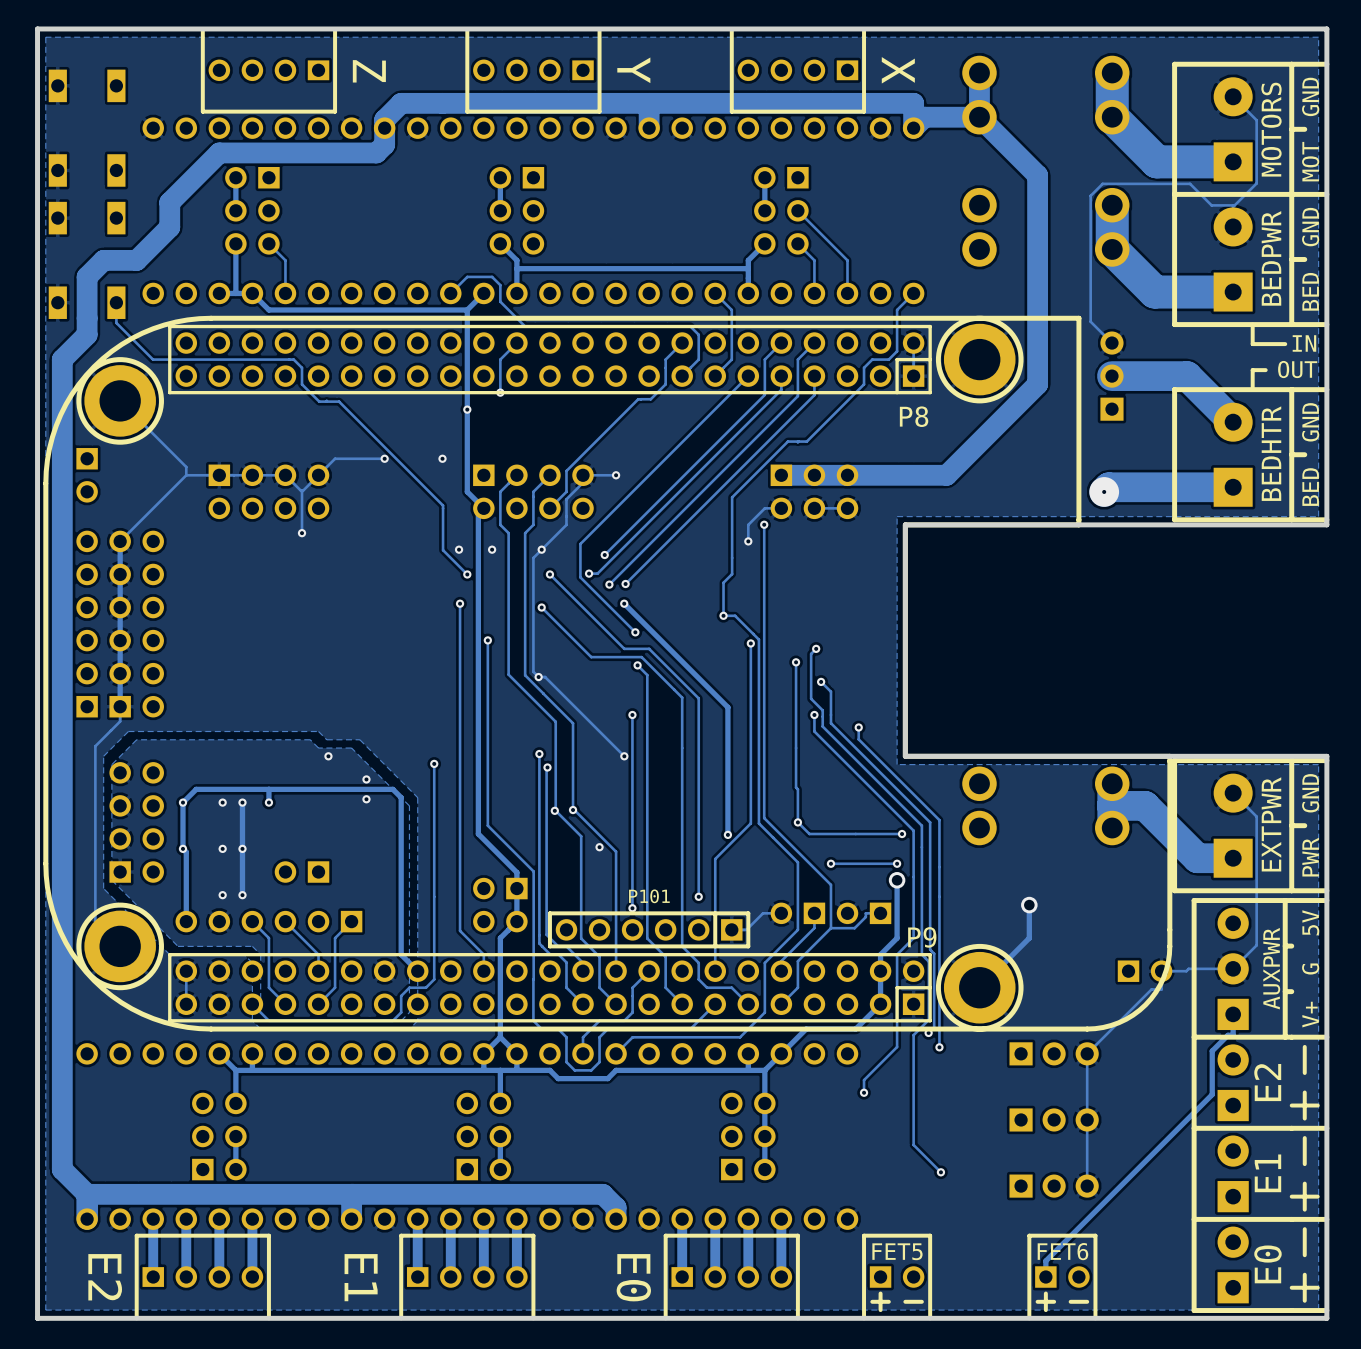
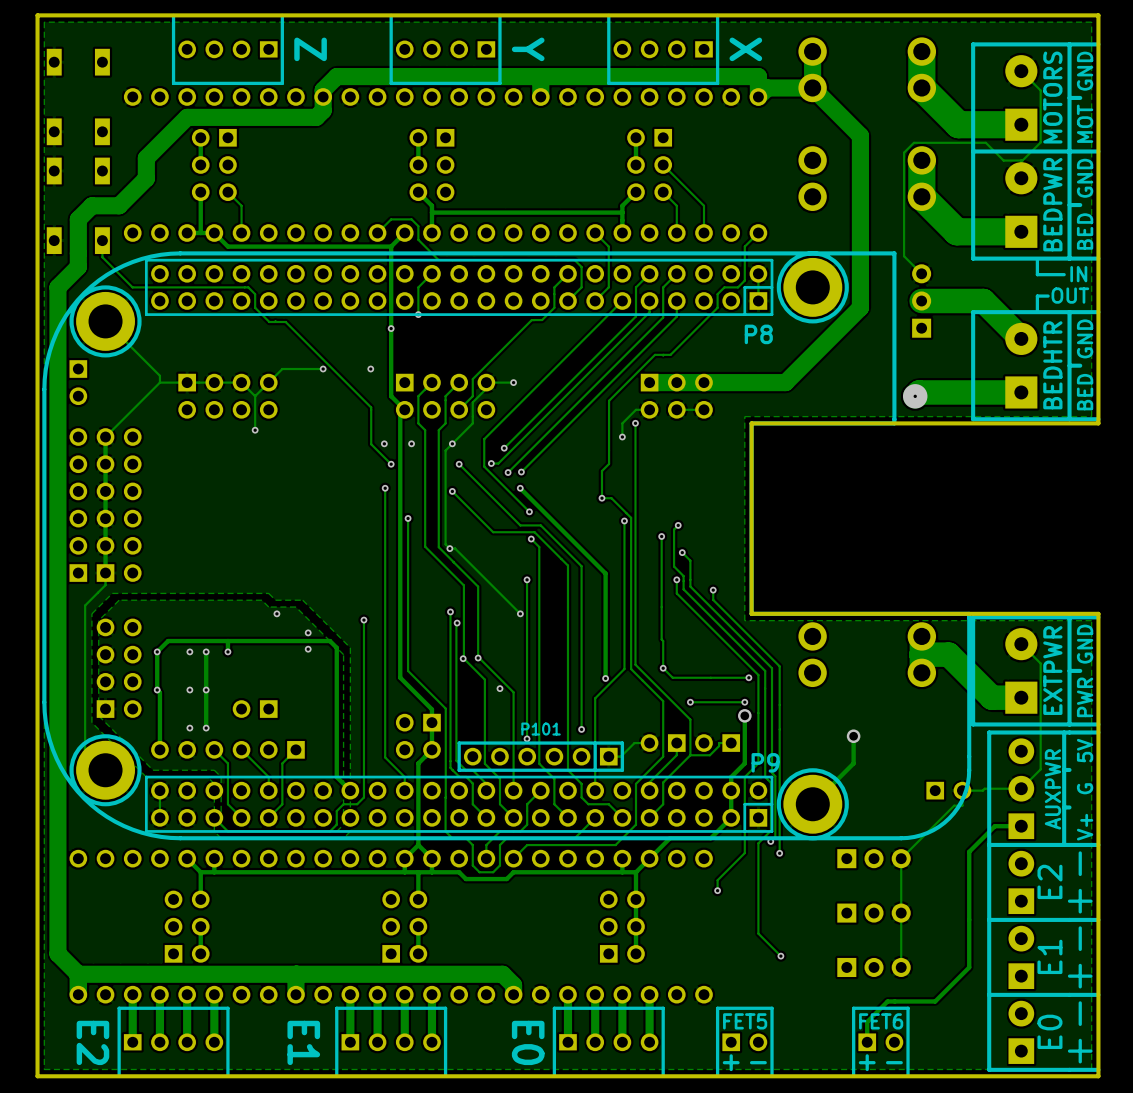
track: (1233, 1014) (1233, 1035) (1227, 1035) (1212, 1051) (1212, 1094) (1045, 1260) -> (1021, 826) (994, 826) (969, 851) (969, 967) (935, 1001) (887, 1001) (867, 1021) (867, 1029)

